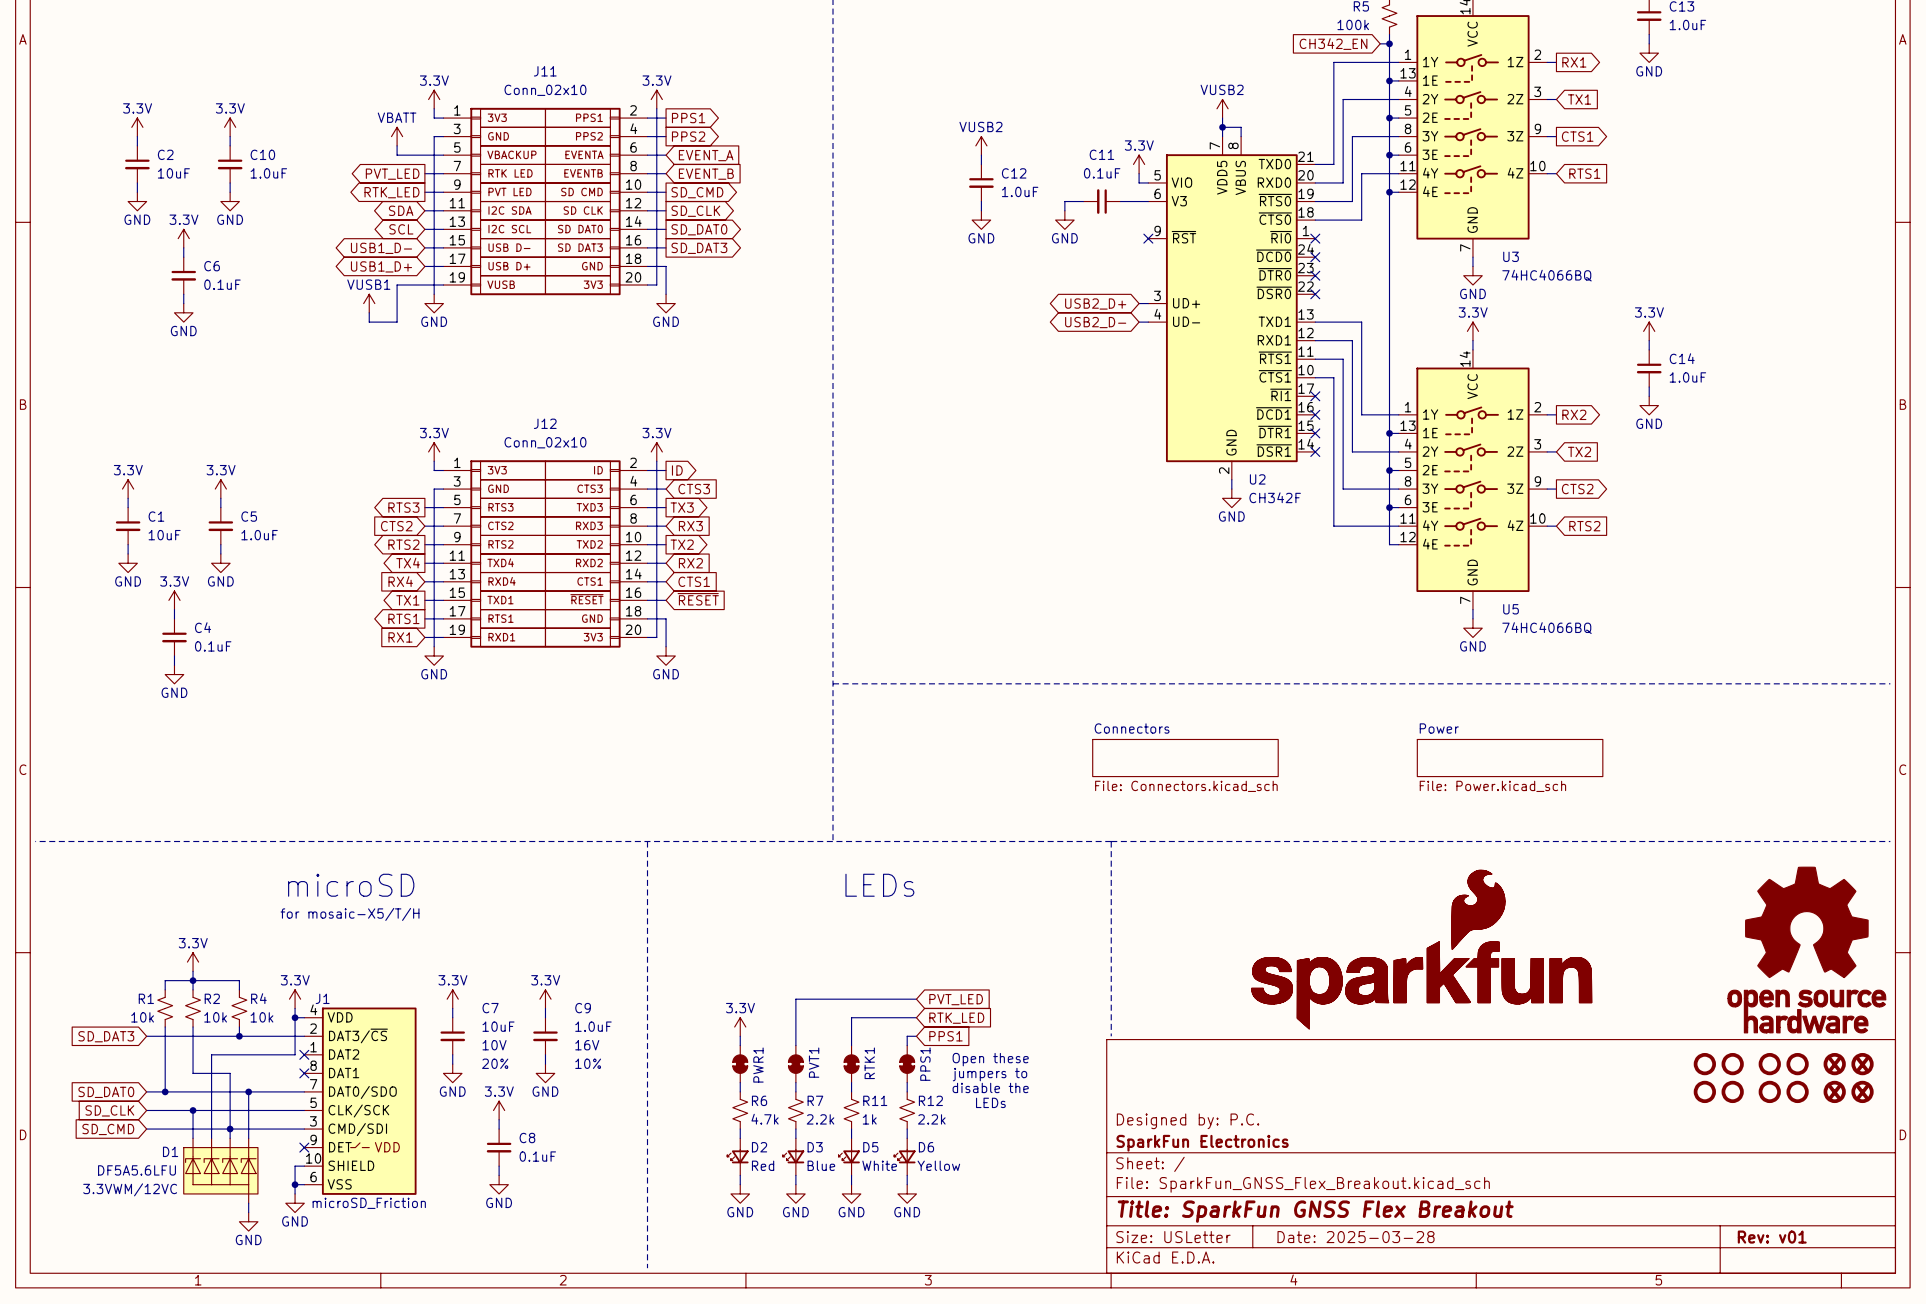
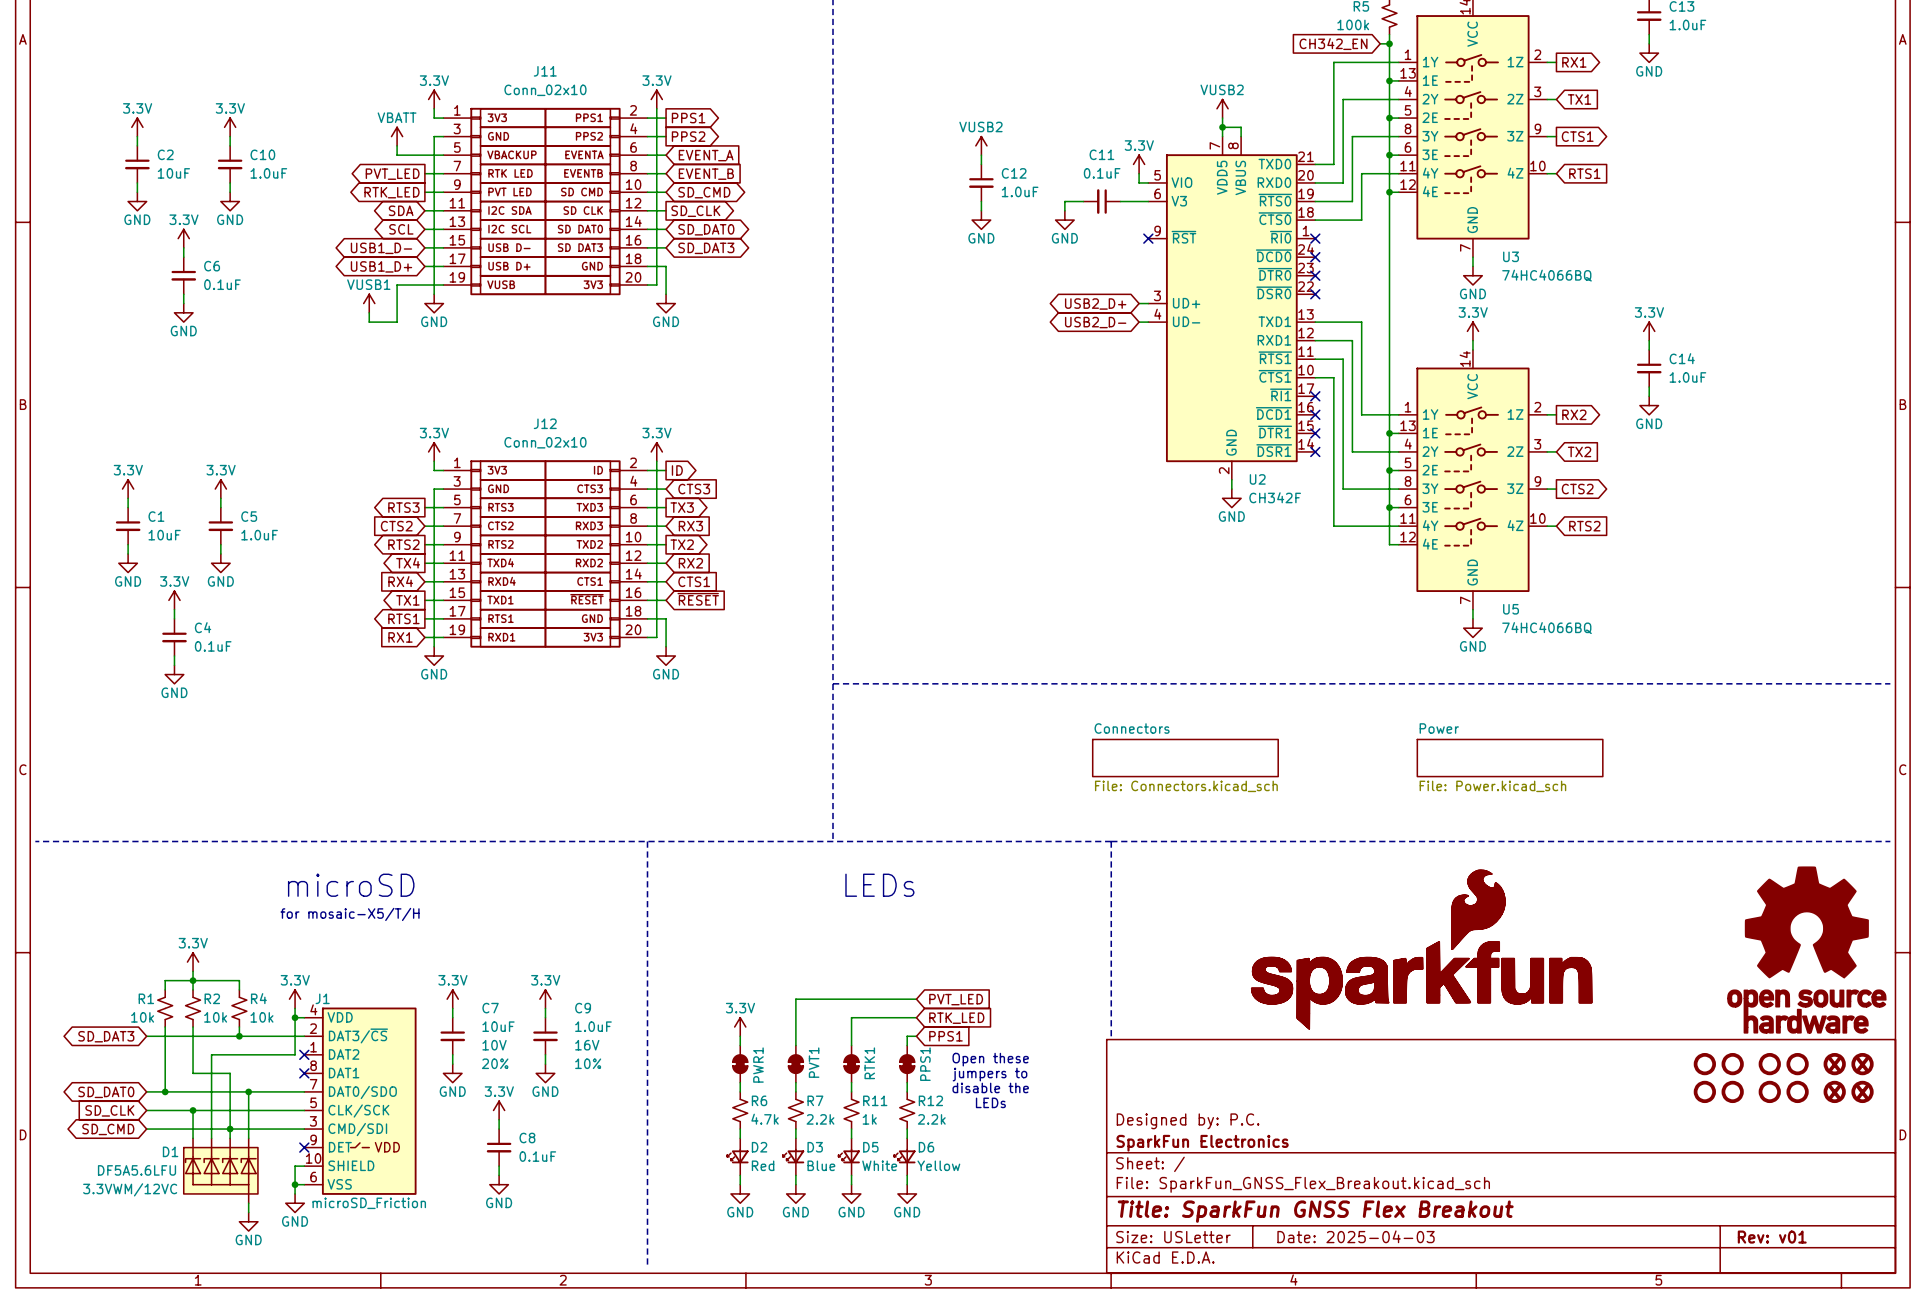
global label shape: output (697, 192) -> bidirectional (704, 192)
global label shape: output (699, 229) -> bidirectional (706, 229)
global label shape: output (699, 248) -> bidirectional (706, 248)
global label shape: input (106, 1036) -> bidirectional (106, 1036)
global label shape: input (106, 1092) -> bidirectional (106, 1092)
global label shape: input (108, 1129) -> bidirectional (108, 1129)
title block: Date: 2025-03-28 (1356, 1237) -> Date: 2025-04-03 (1356, 1236)

